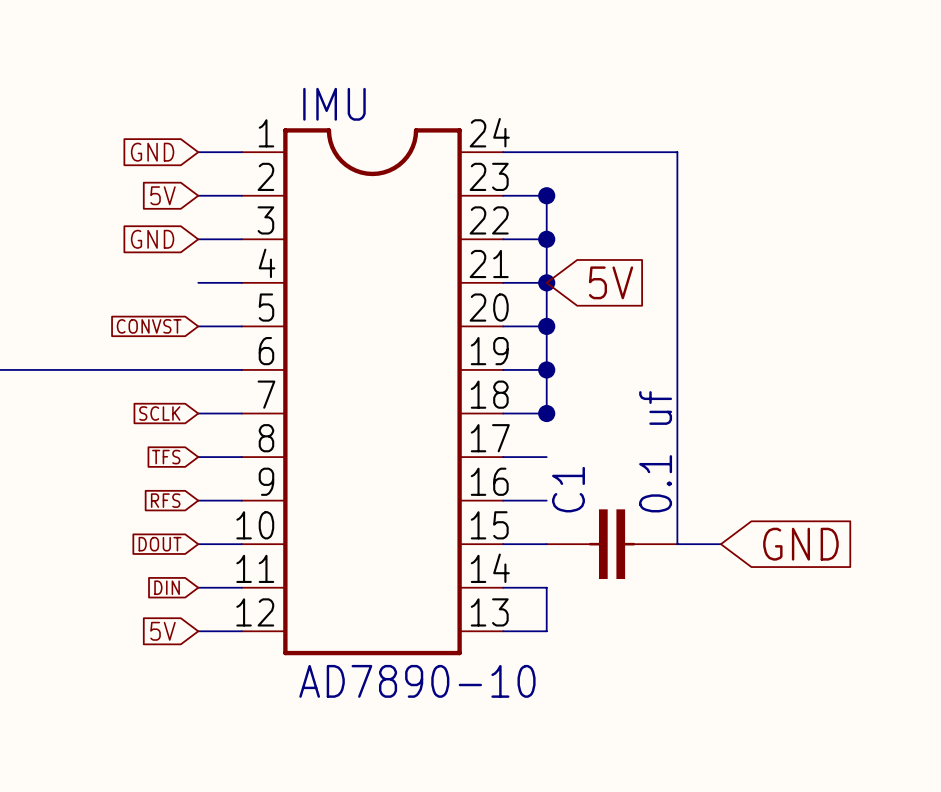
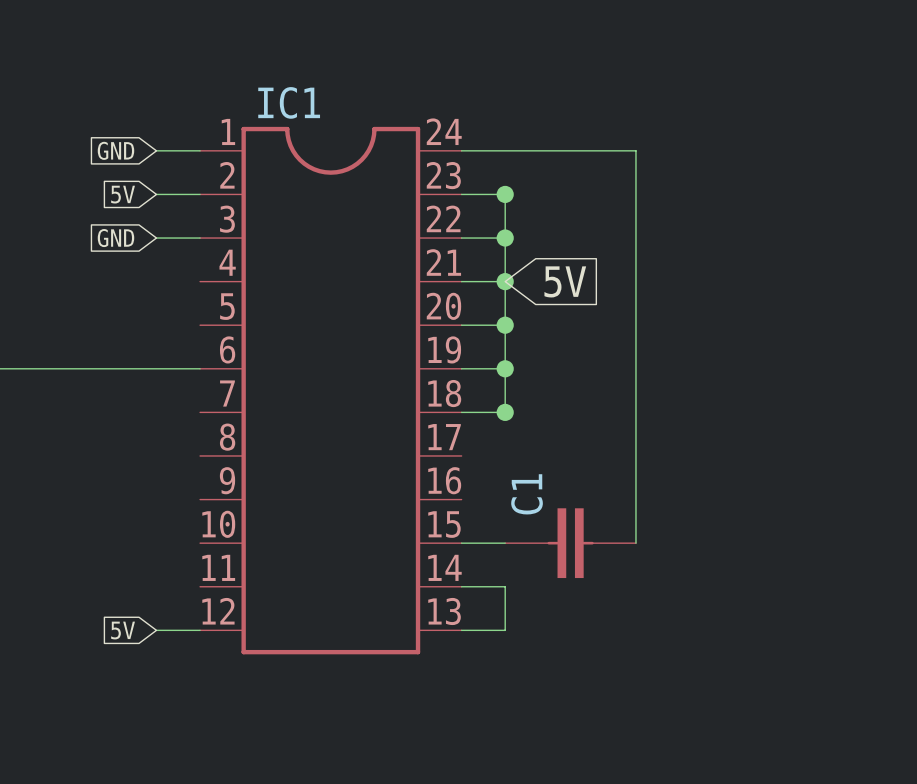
IMU name: IMU (334, 104) -> IC1 (289, 102)
wire: (198, 282) (241, 282) -> none
global label: CONVST (149, 326) -> none
wire: (198, 326) (241, 326) -> none
global label: SCLK (159, 413) -> none
wire: (198, 413) (241, 413) -> none
C1 value: 0.1 uf (655, 451) -> none
global label: TFS (166, 457) -> none
wire: (198, 457) (241, 457) -> none
wire: (503, 457) (546, 457) -> none
global label: RFS (165, 500) -> none
wire: (198, 500) (241, 500) -> none
wire: (503, 500) (546, 500) -> none
global label: DOUT (160, 544) -> none
wire: (198, 544) (241, 544) -> none
wire: (677, 544) (720, 544) -> none
global label: GND (800, 544) -> none
global label: DIN (167, 587) -> none
wire: (198, 587) (241, 587) -> none
IMU value: AD7890-10 (417, 681) -> none

